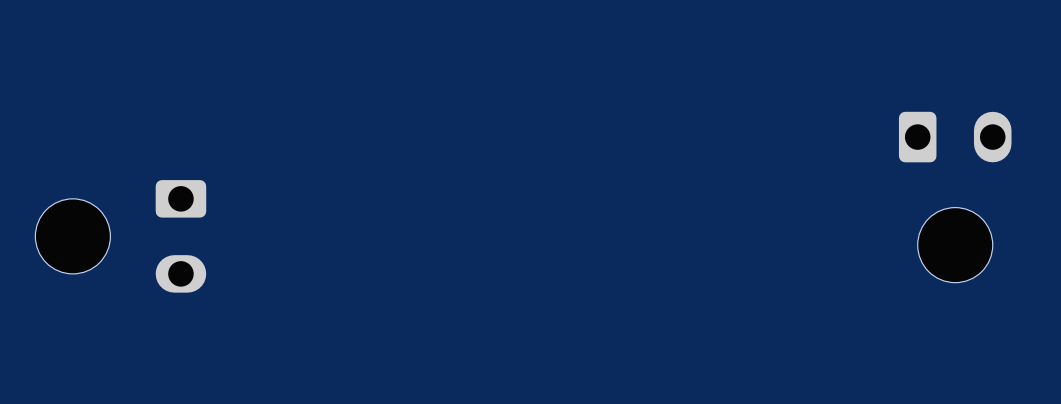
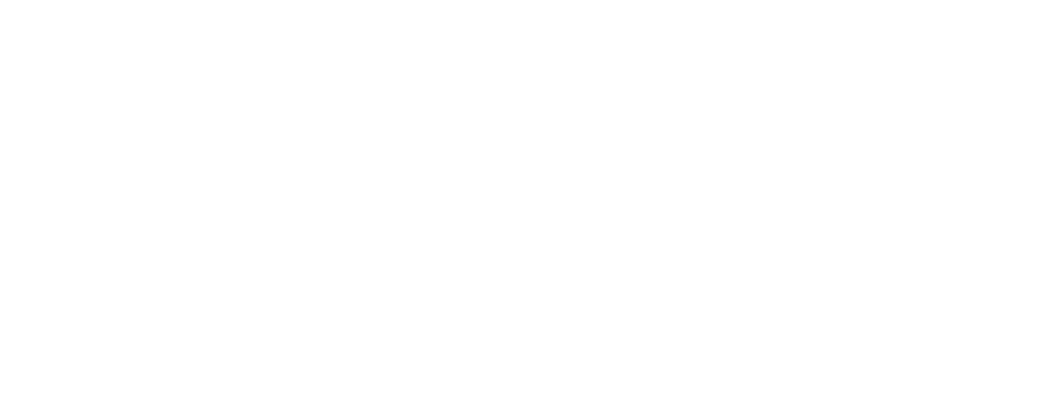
part: (955, 197) -> none
part: (120, 236) -> none

